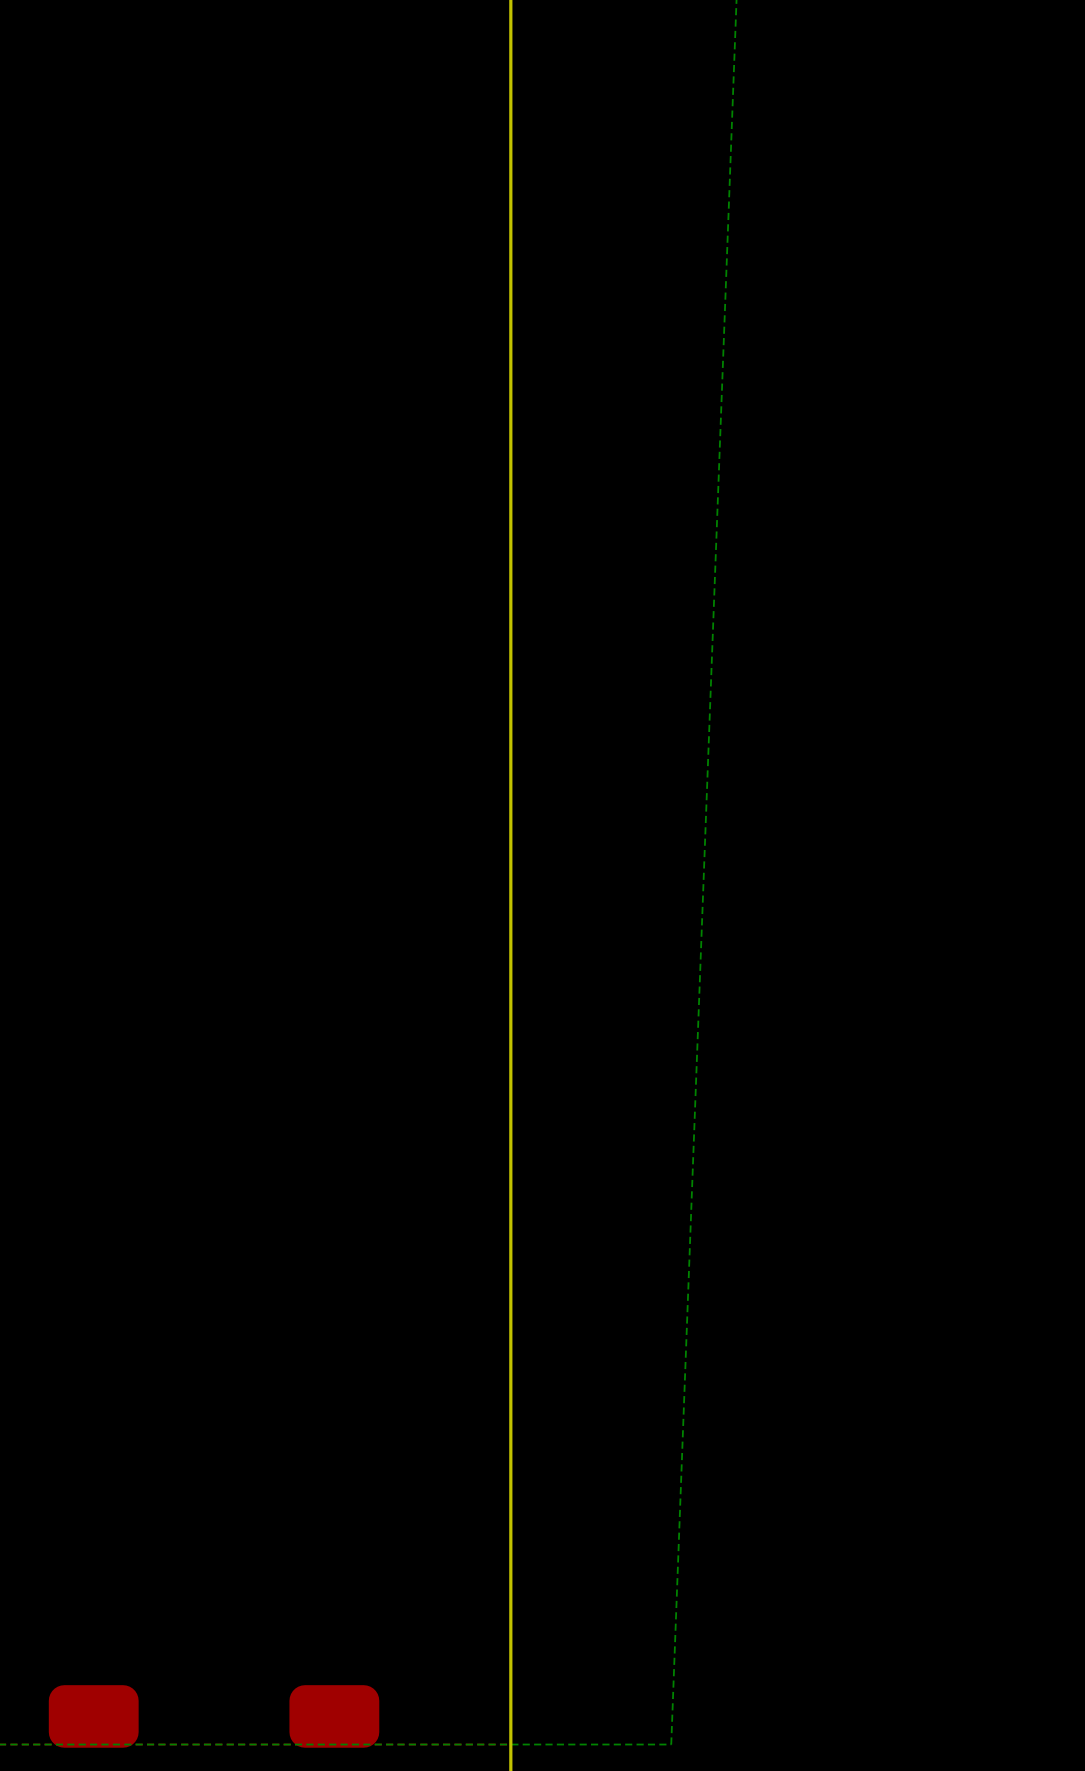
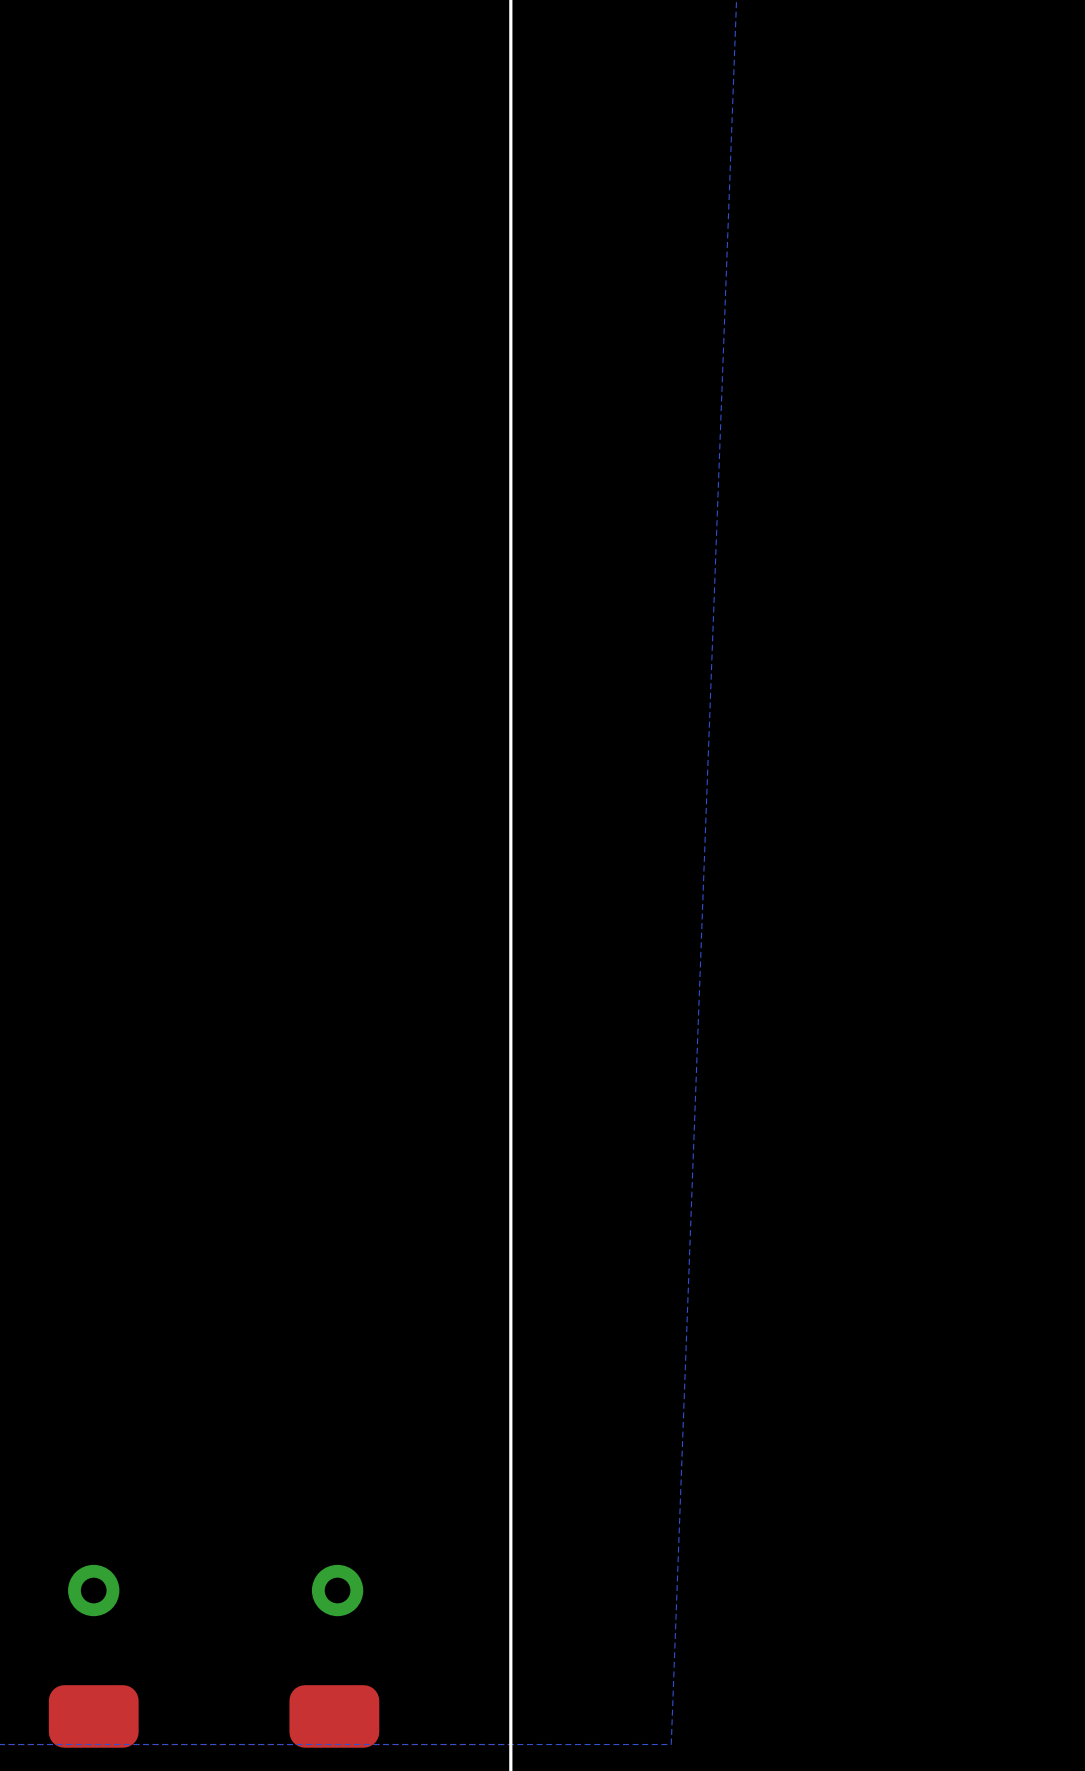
via: none -> (93, 1590)
via: none -> (337, 1590)

